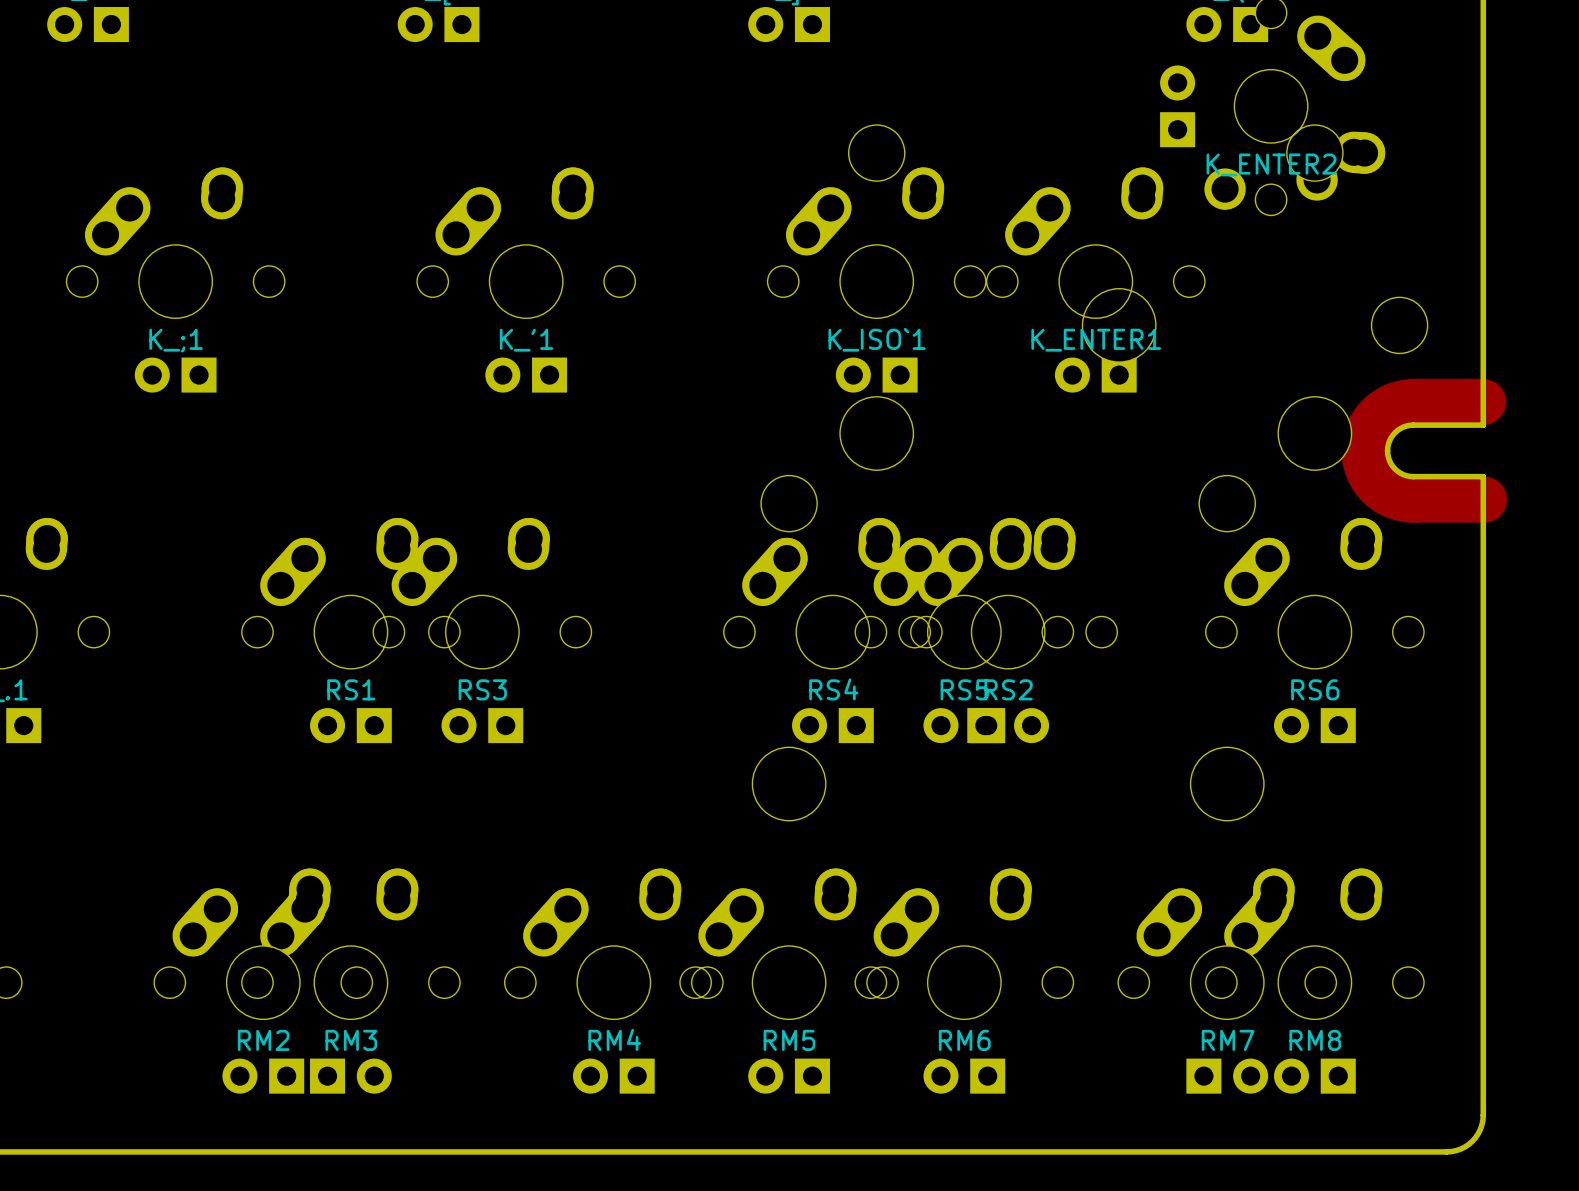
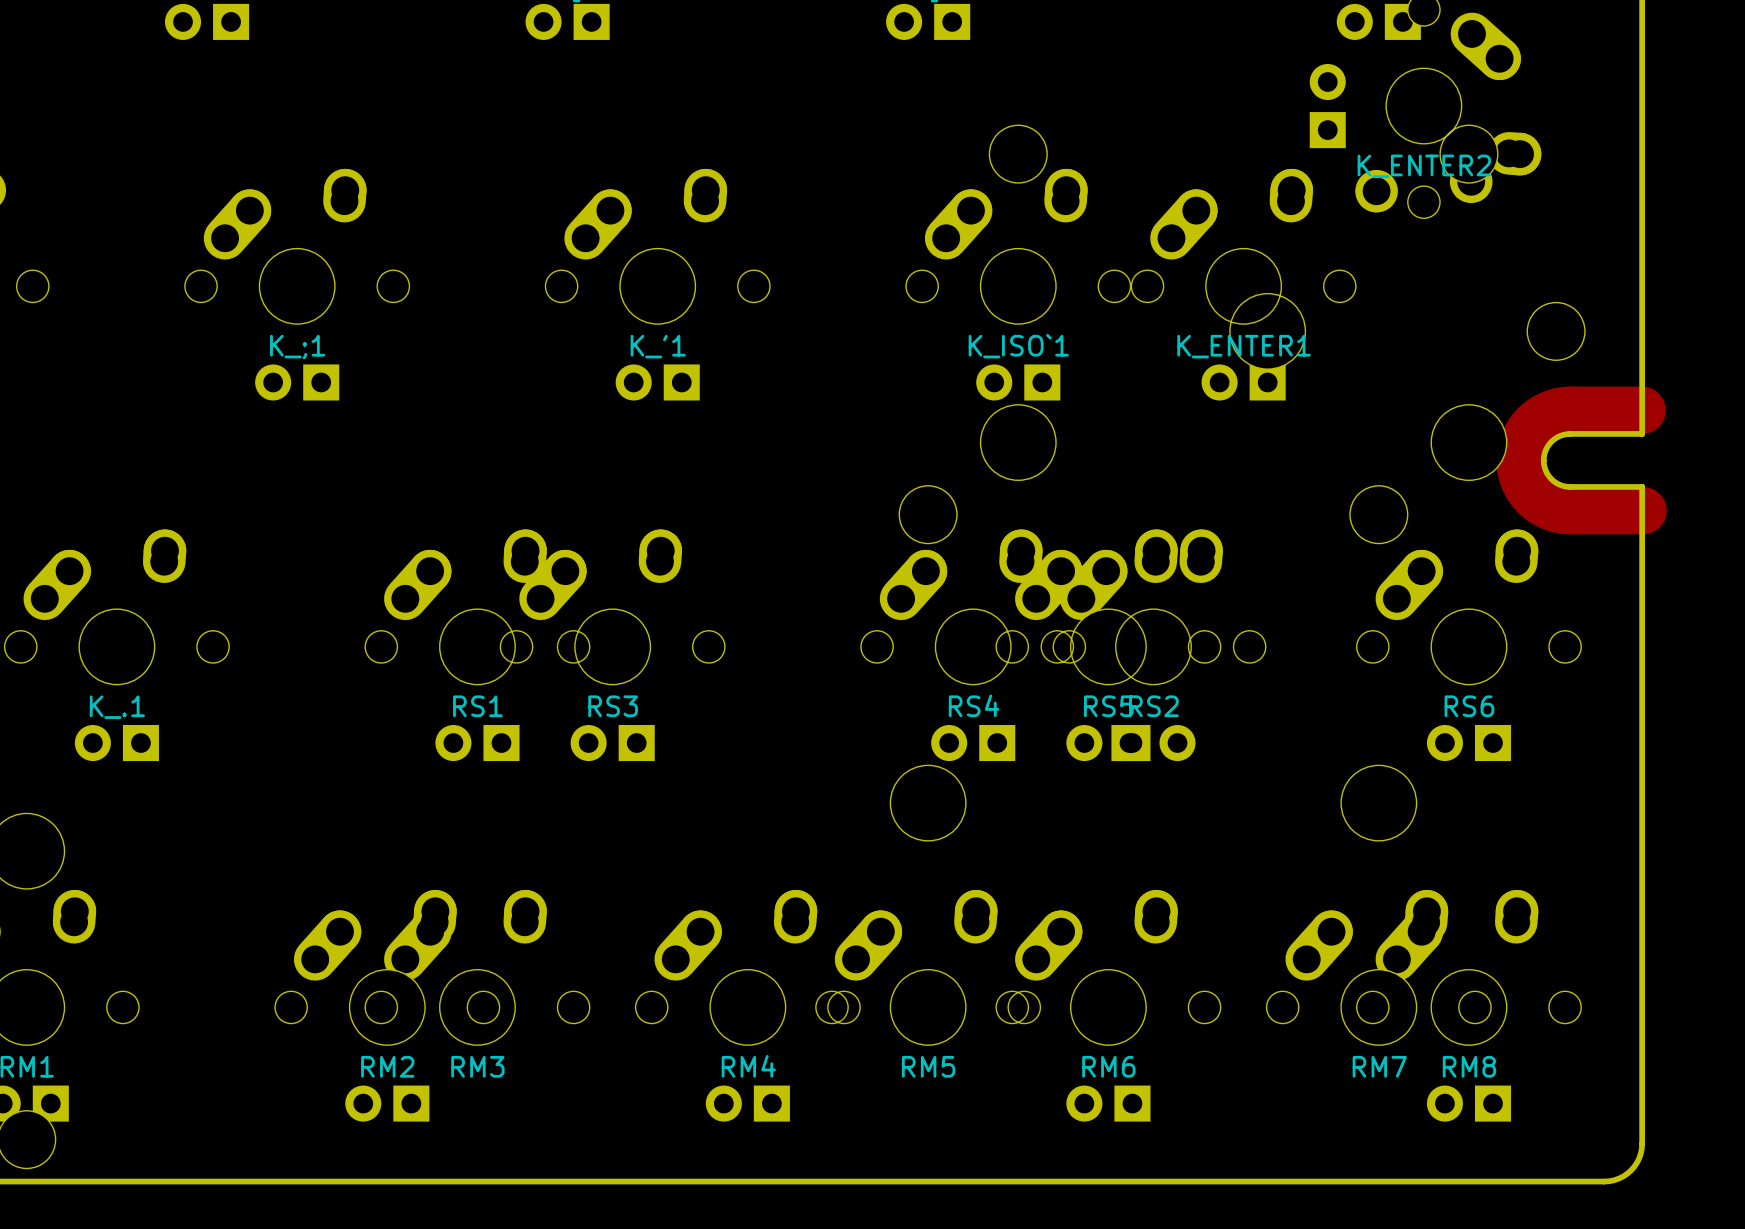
part: (350, 1076) -> none
part: (789, 1076) -> none
part: (1227, 1076) -> none

